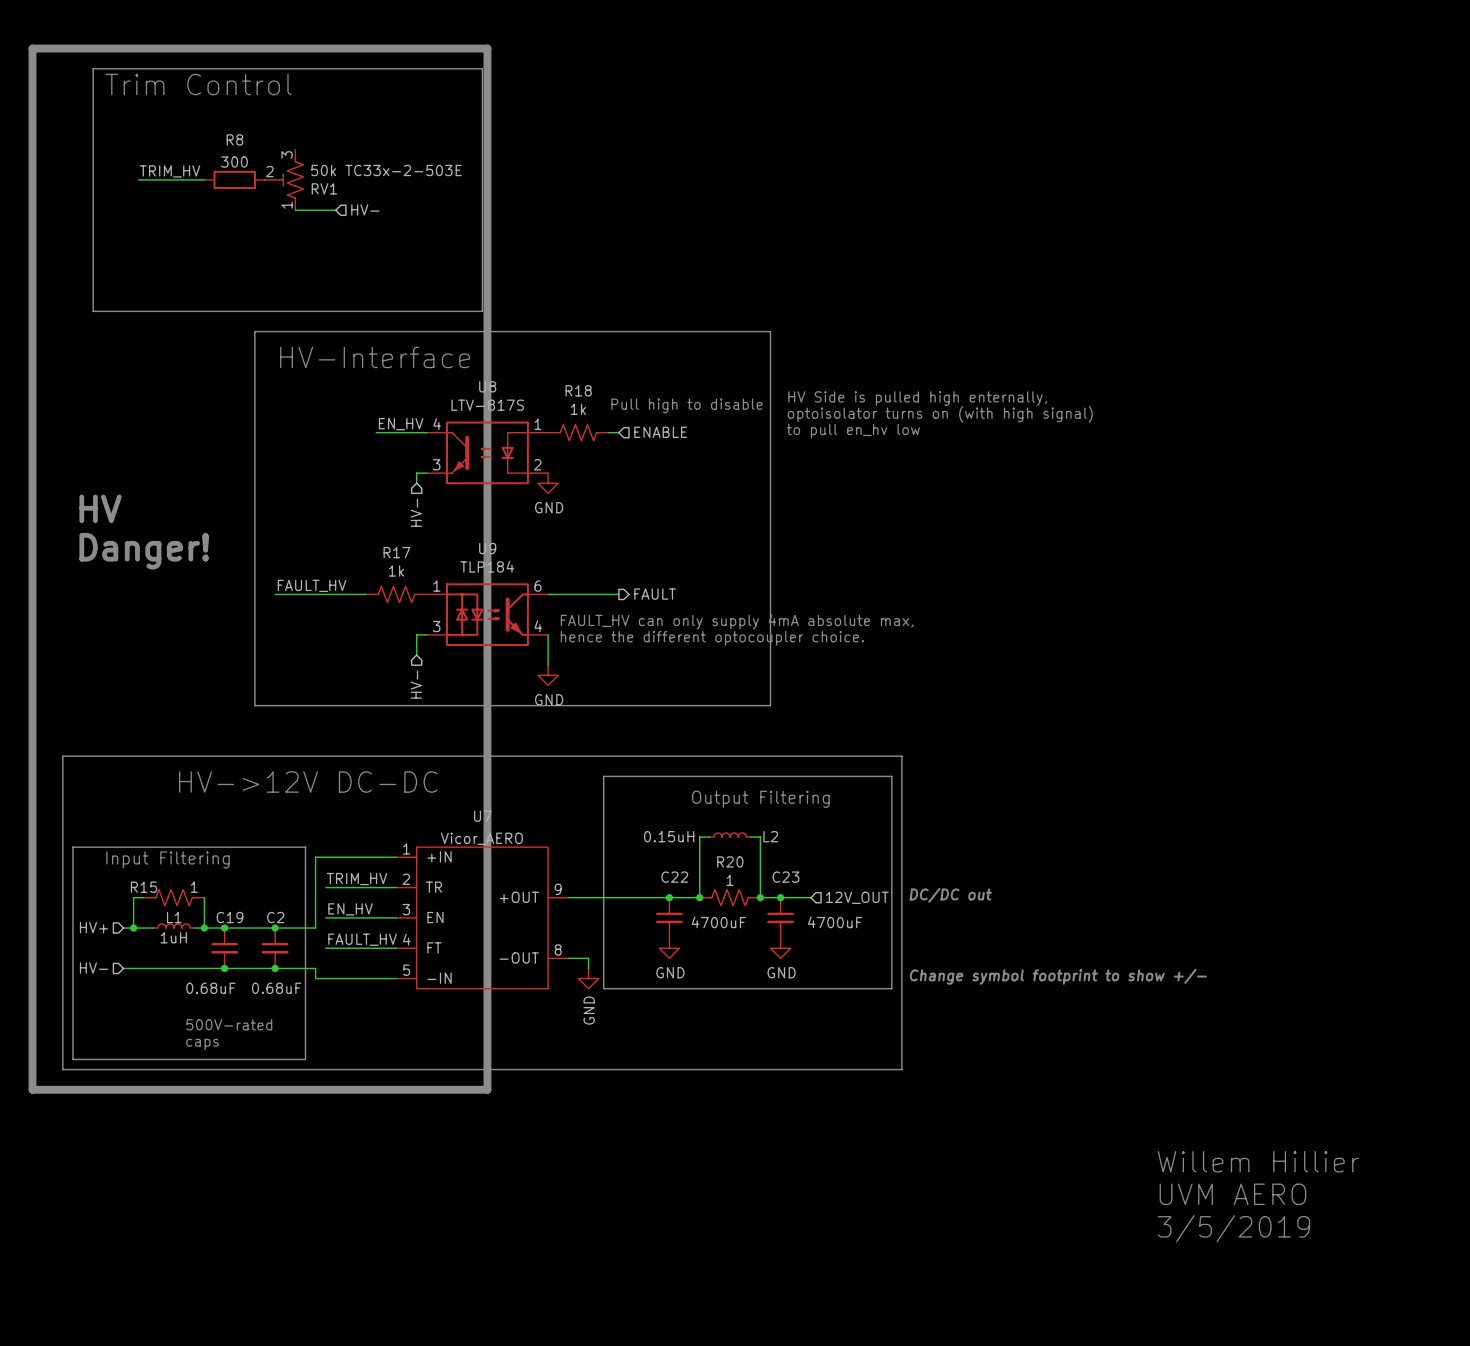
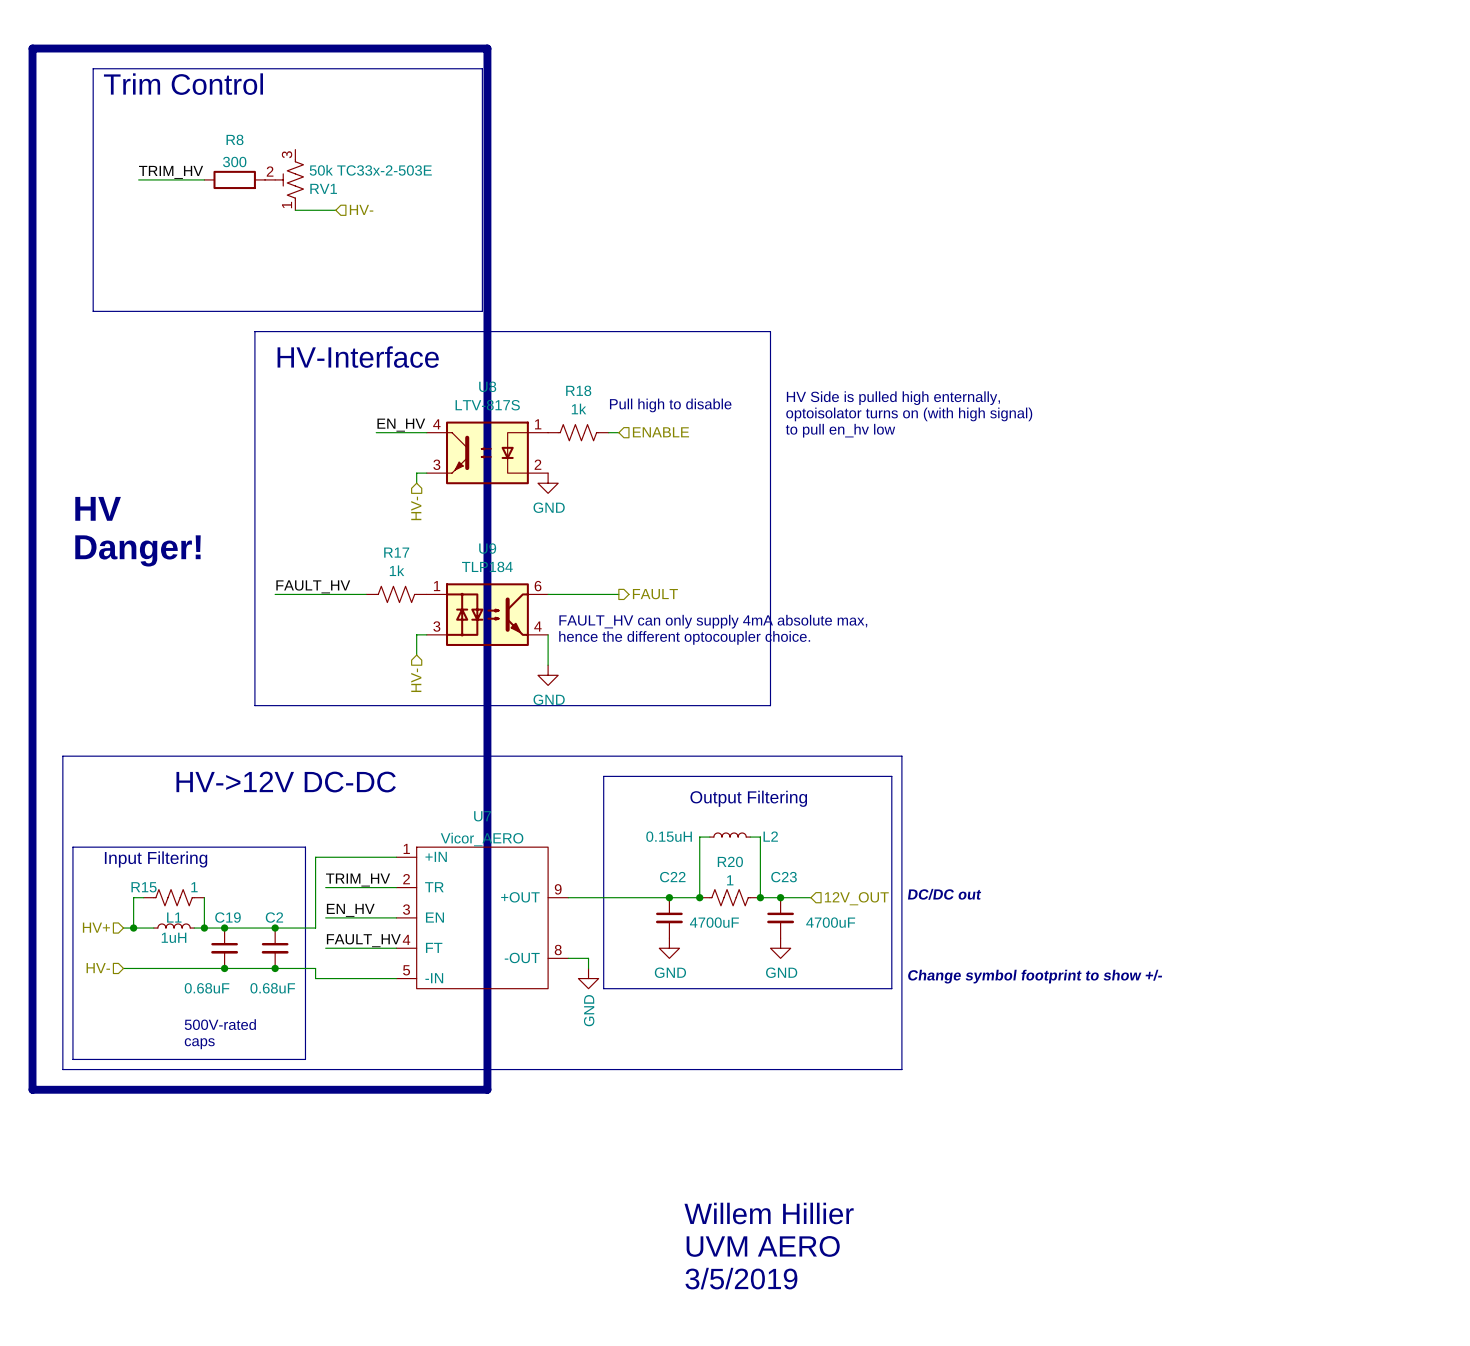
text: Willem Hillier (1258, 1161) -> none
text: UVM AERO (1232, 1194) -> none
text: none -> Willem Hillier (769, 1213)
text: 3/5/2019 (1233, 1228) -> none
text: none -> UVM AERO (763, 1246)
text: none -> 3/5/2019 (741, 1278)

